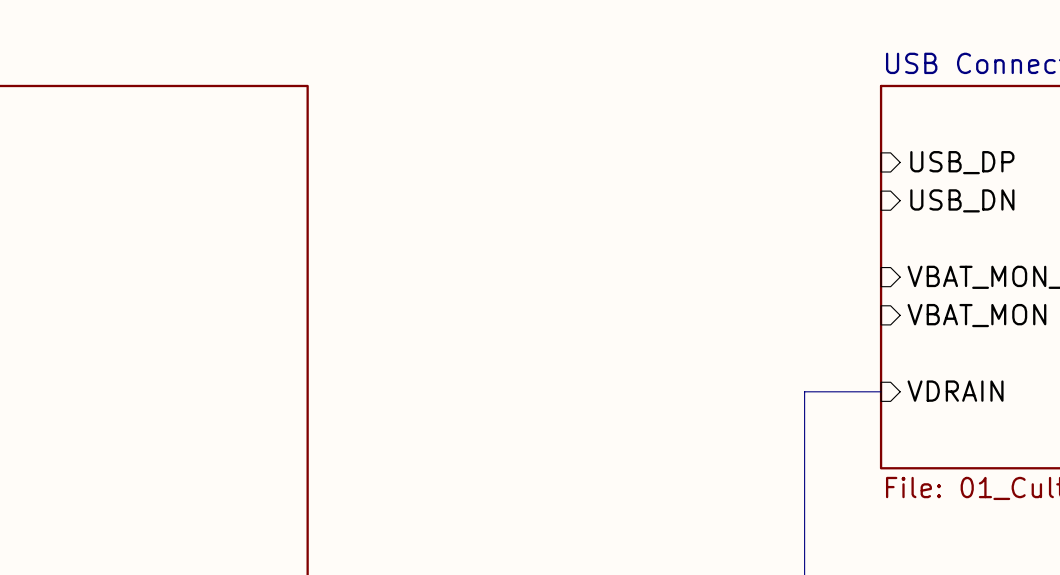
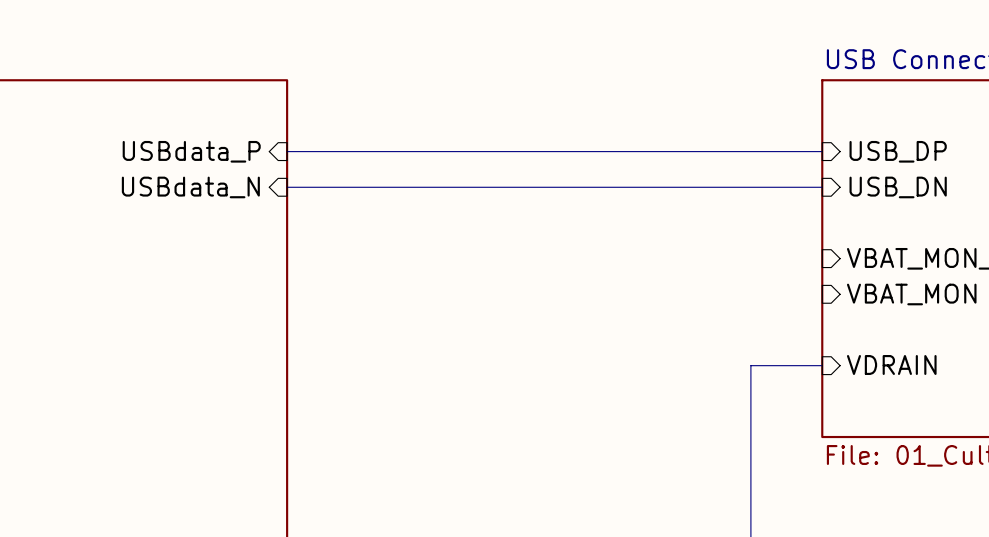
sheet pin: none -> USBdata_P (191, 151)
wire: none -> (287, 151) (822, 151)
sheet pin: none -> USBdata_N (190, 187)
wire: none -> (287, 187) (822, 187)

